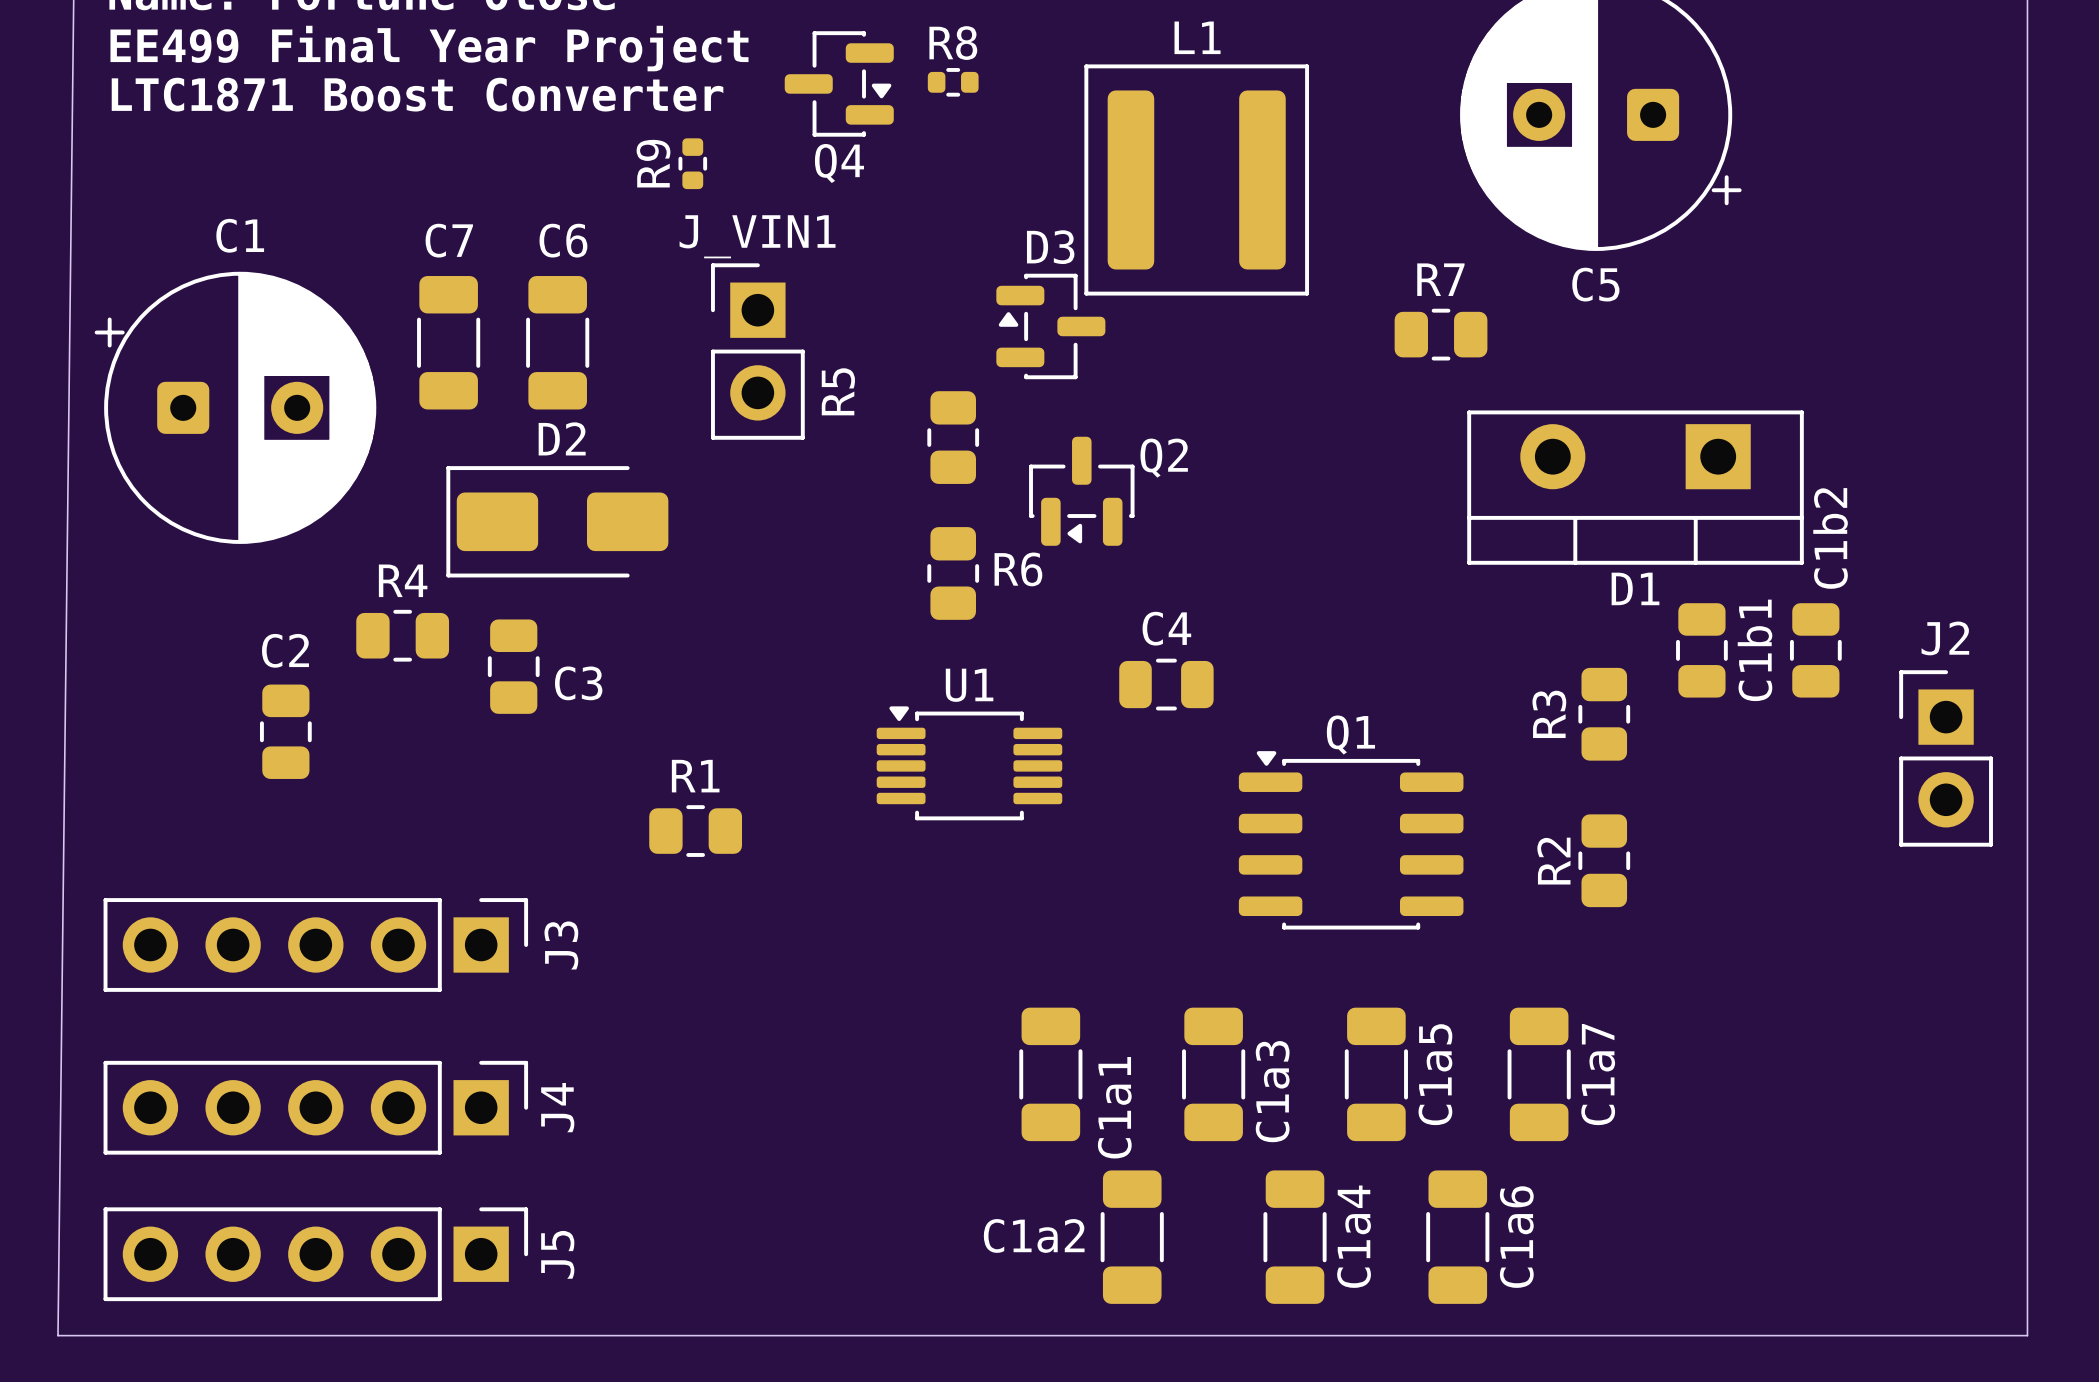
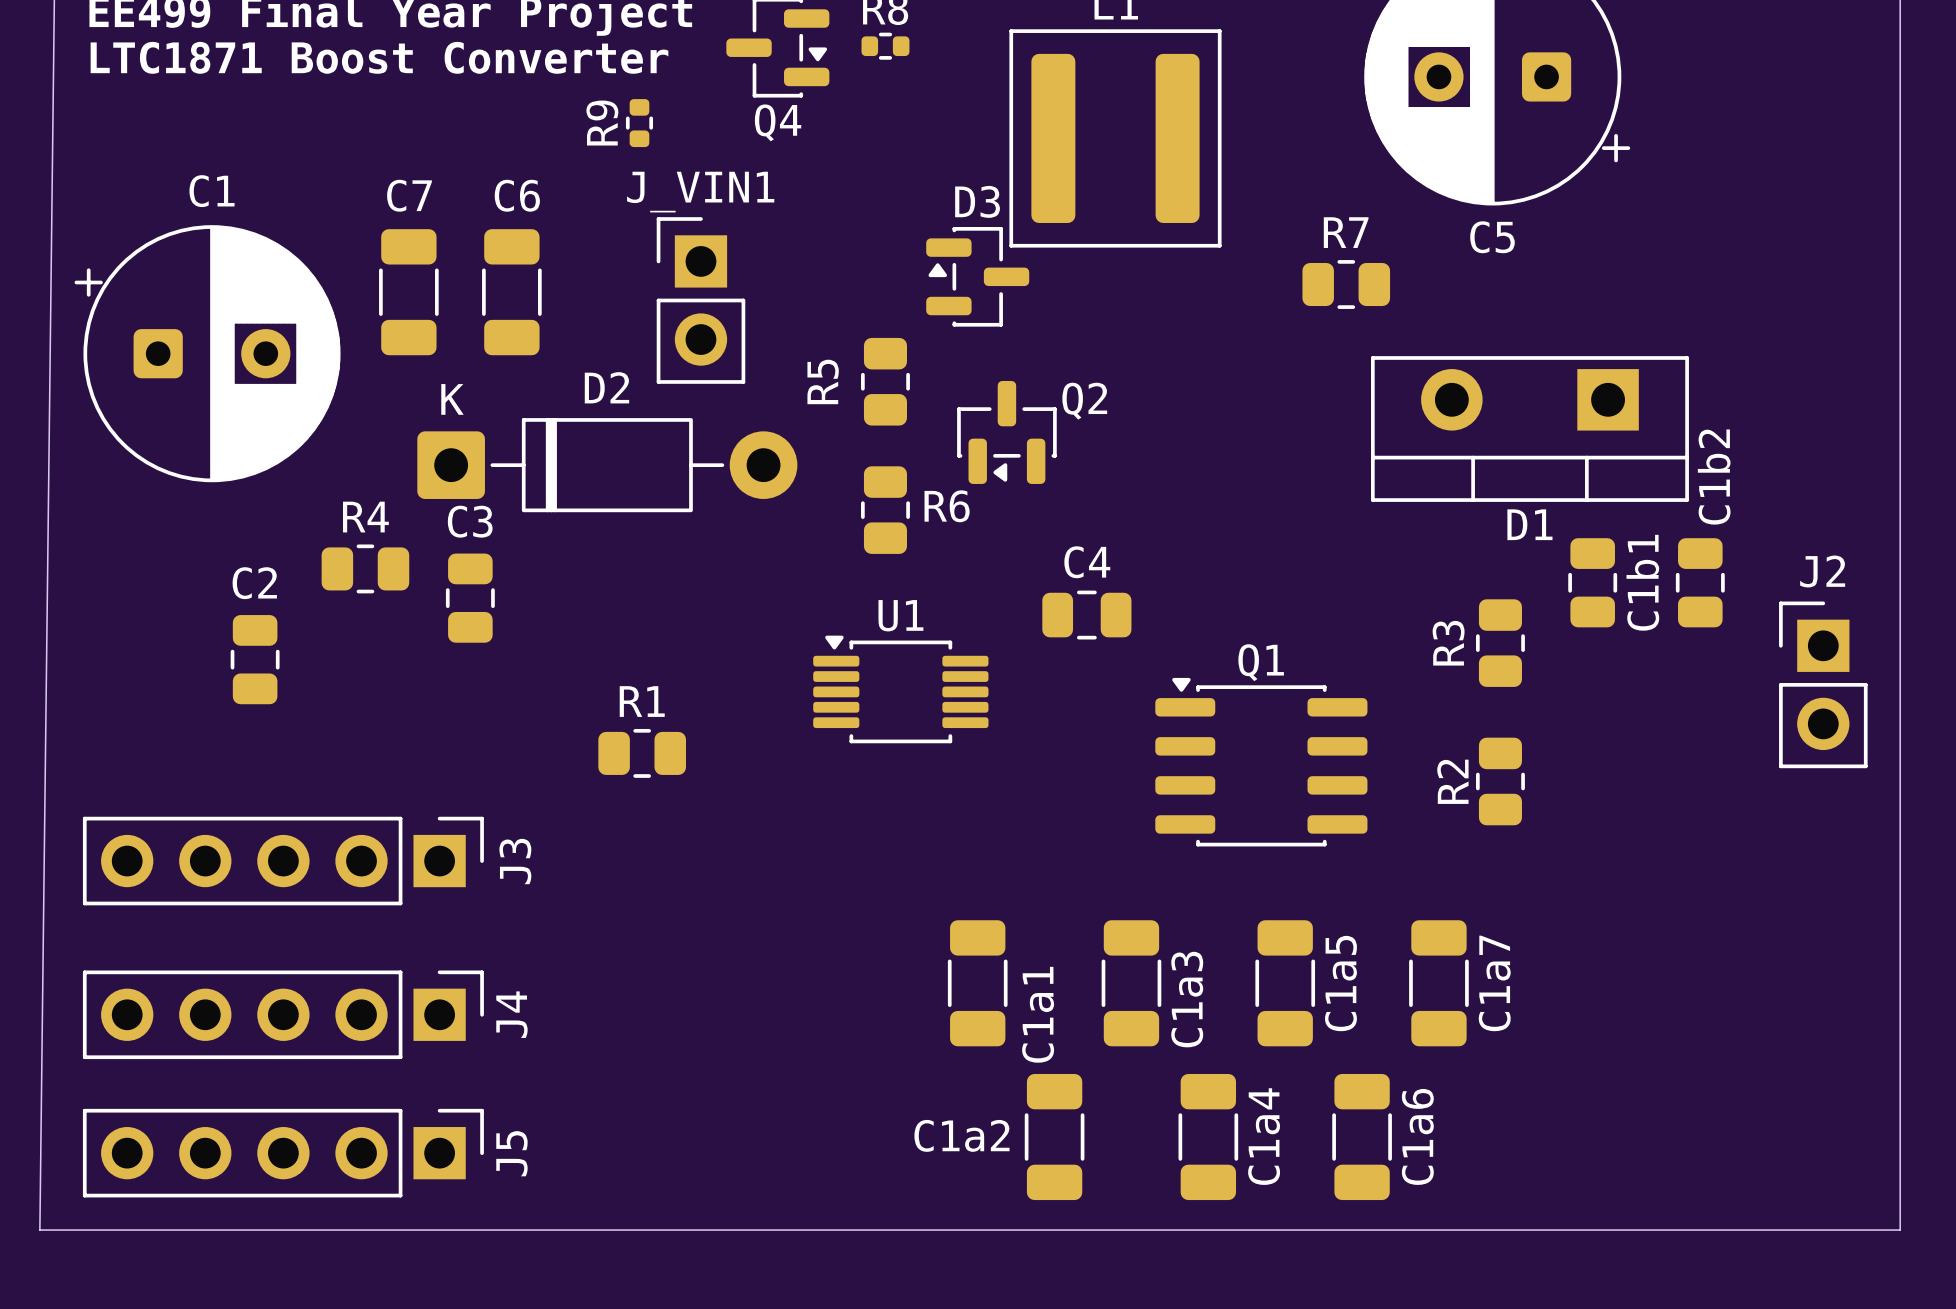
R5 name position: R5 (838, 391) -> R5 (823, 381)
D2 footprint: [446, 466, 669, 578] -> [417, 418, 798, 513]
C3 name position: C3 (578, 683) -> C3 (470, 521)

